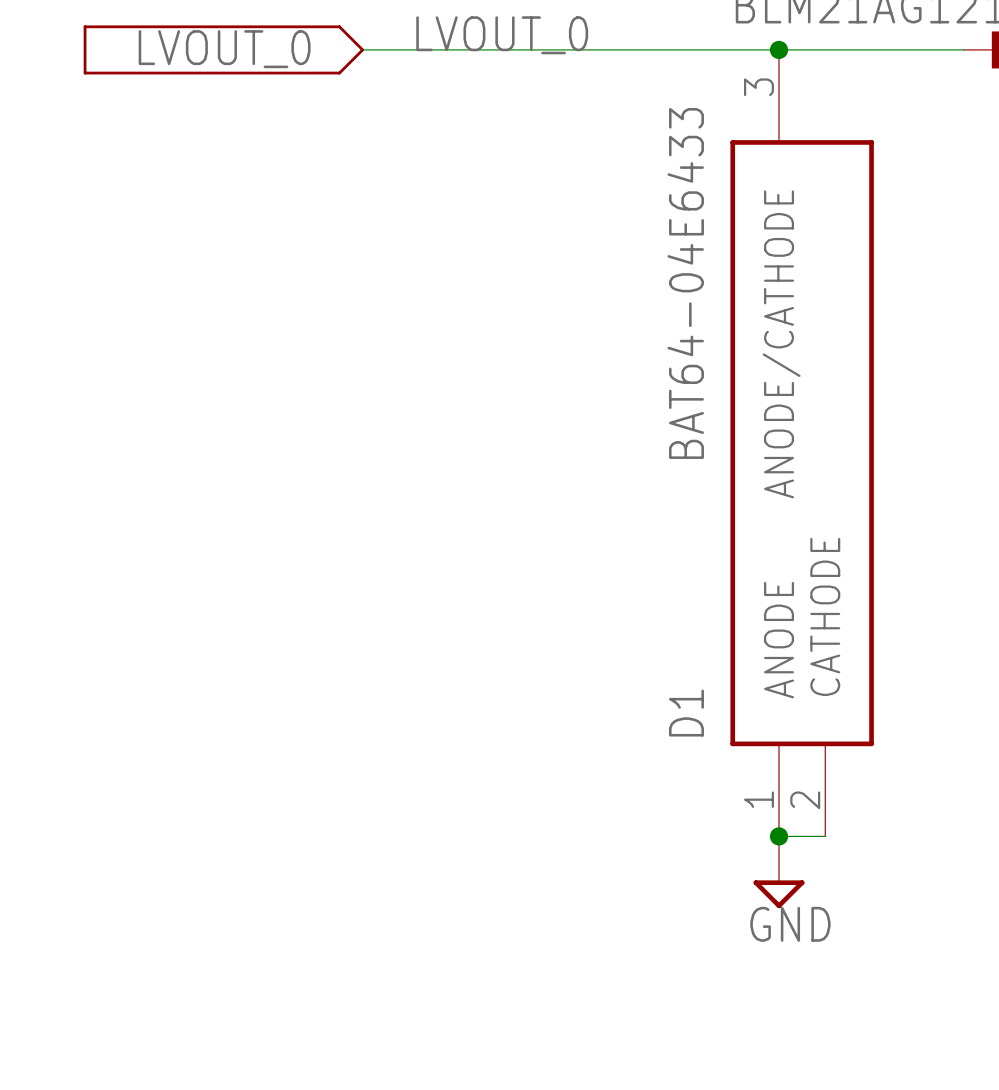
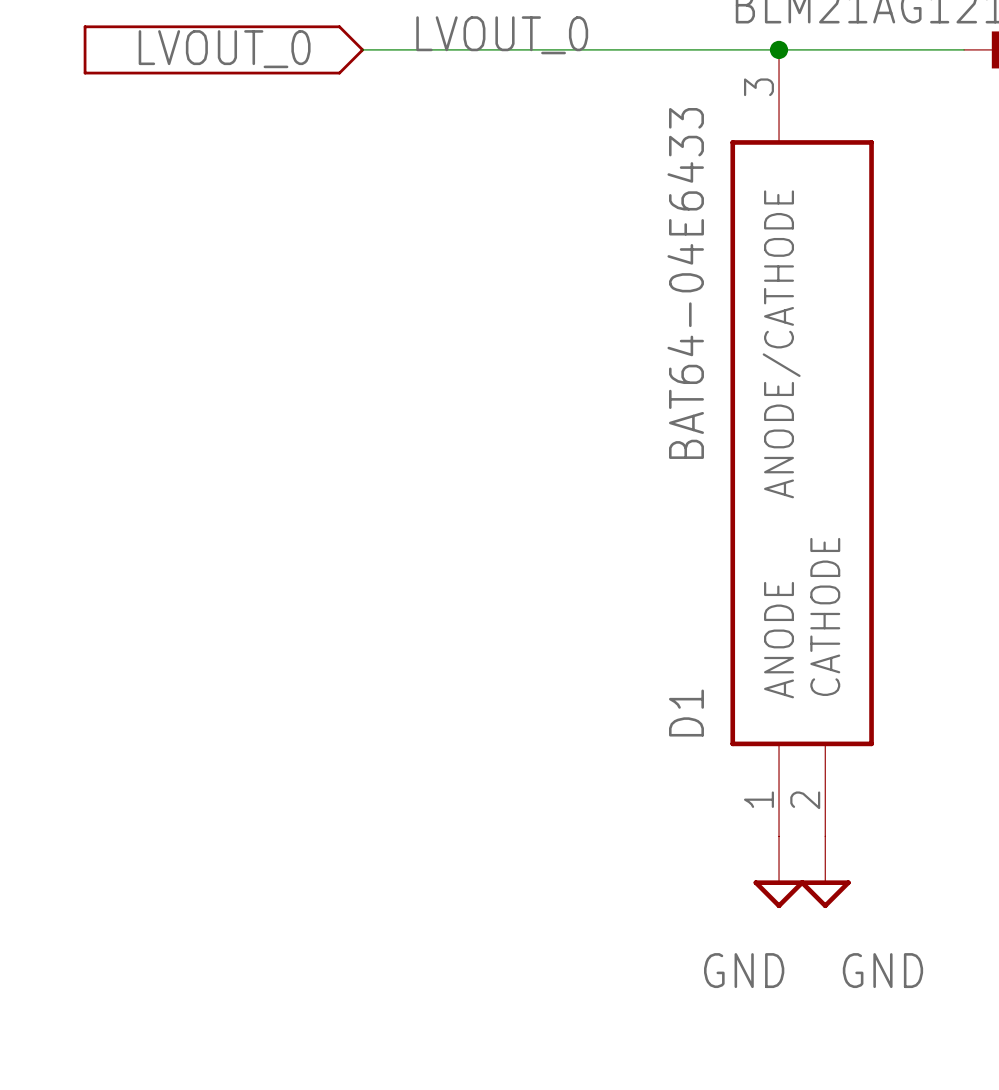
wire: (779, 836) (825, 836) -> none
junction: (779, 836) -> none
power symbol: none -> GND (825, 872)
power symbol text position: GND (790, 924) -> GND (744, 970)

